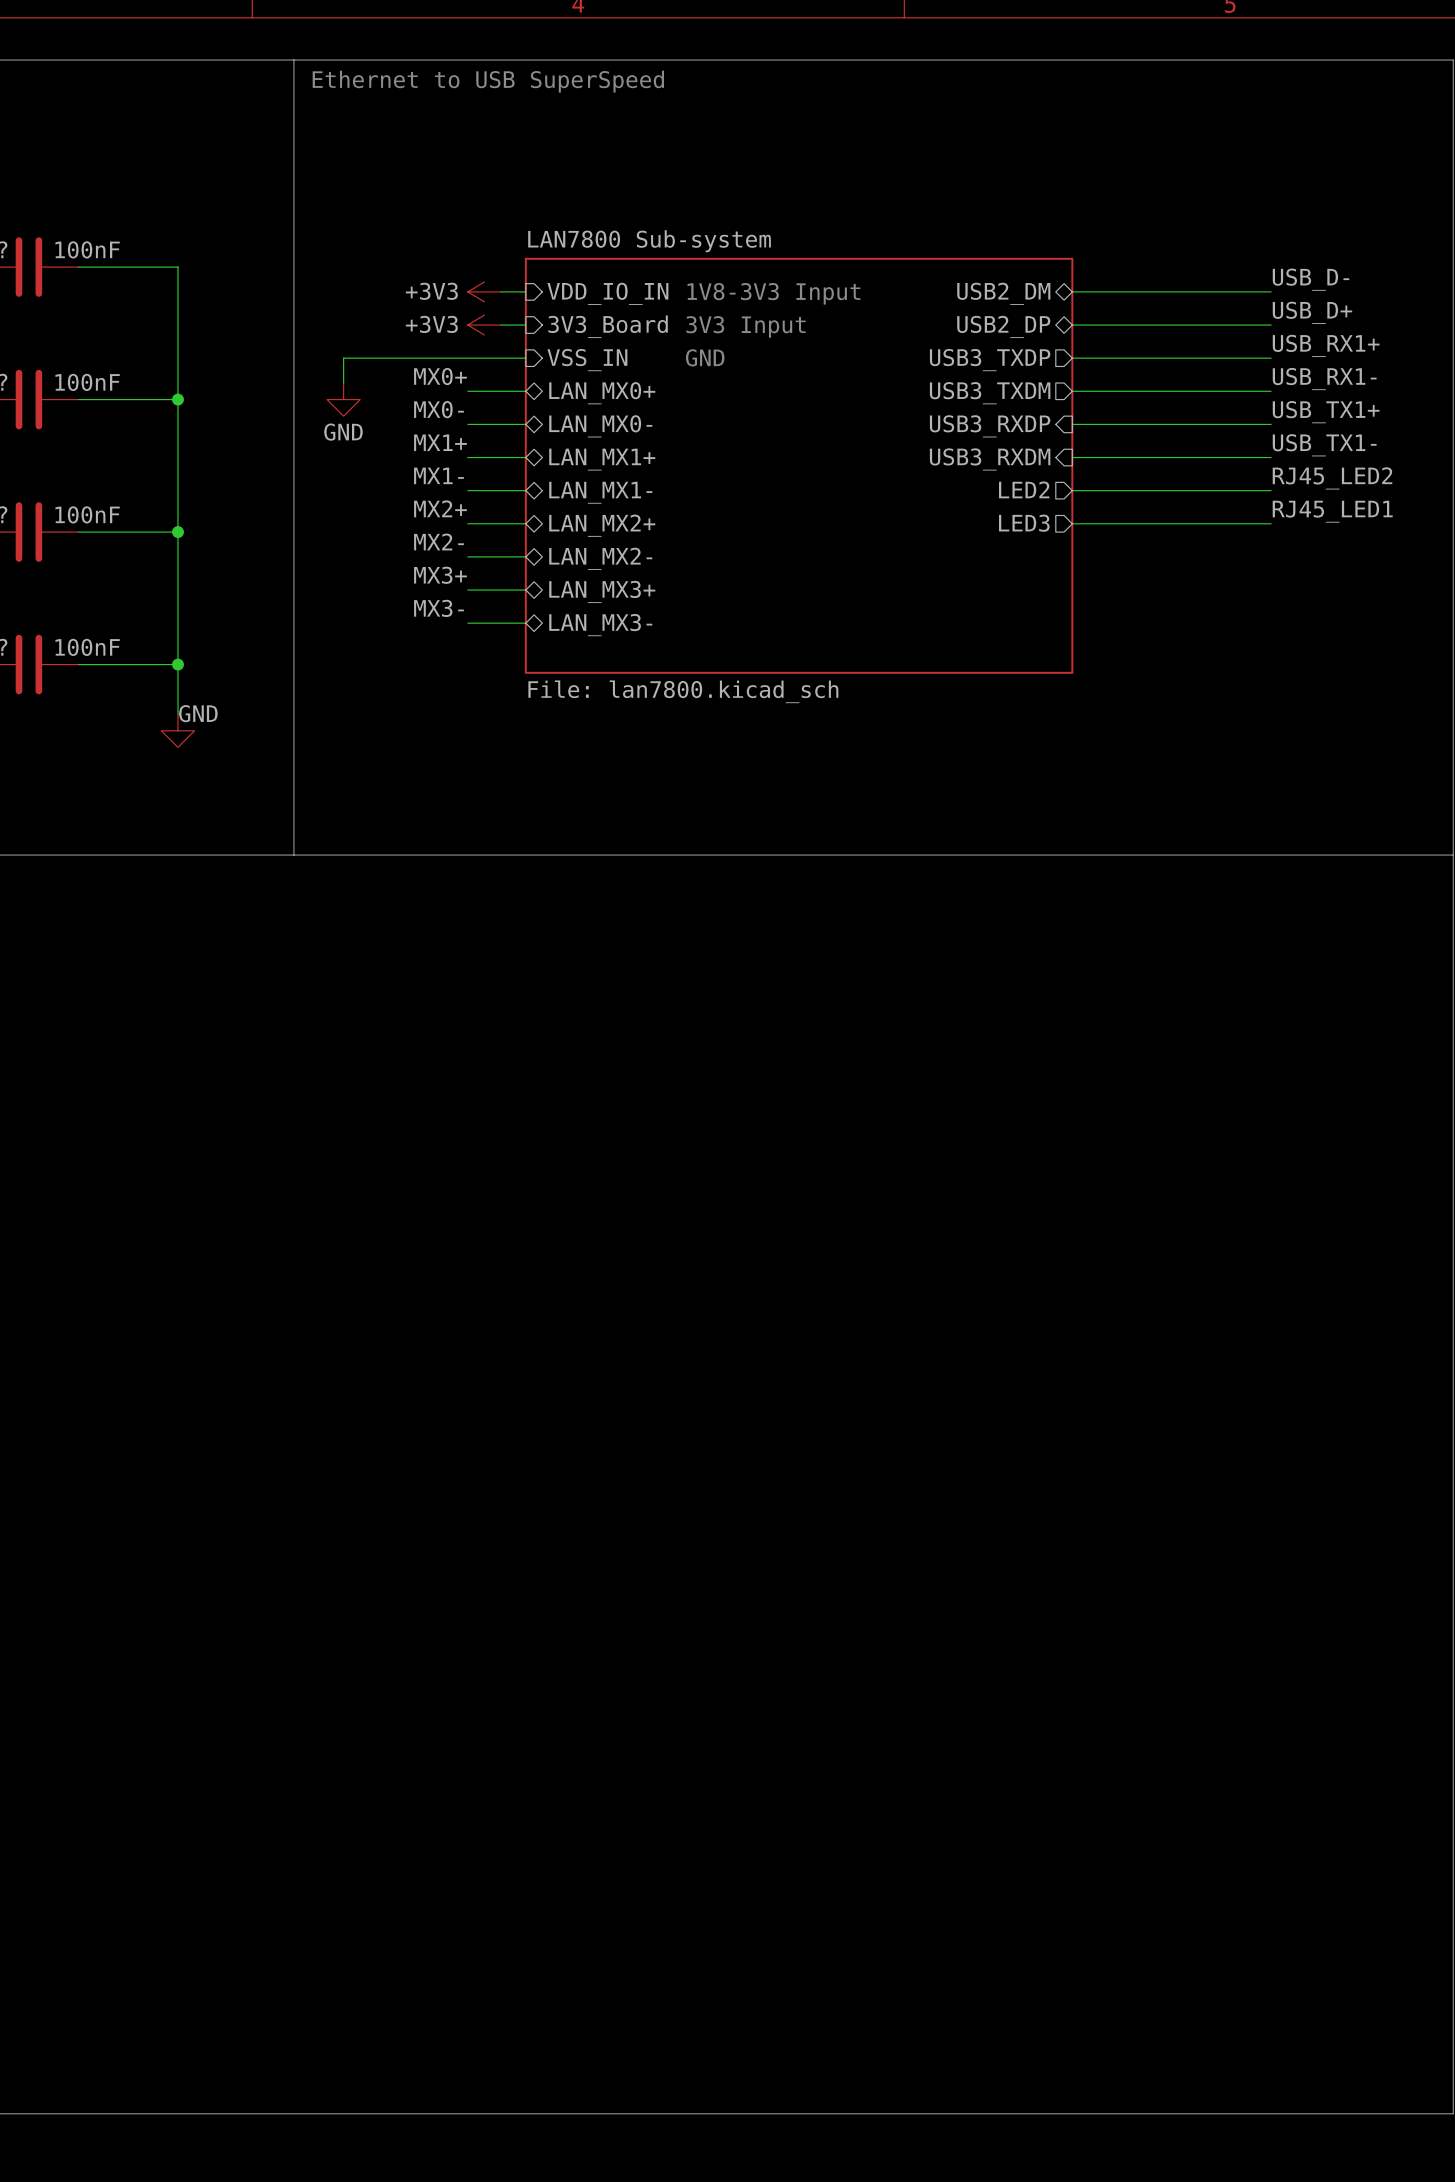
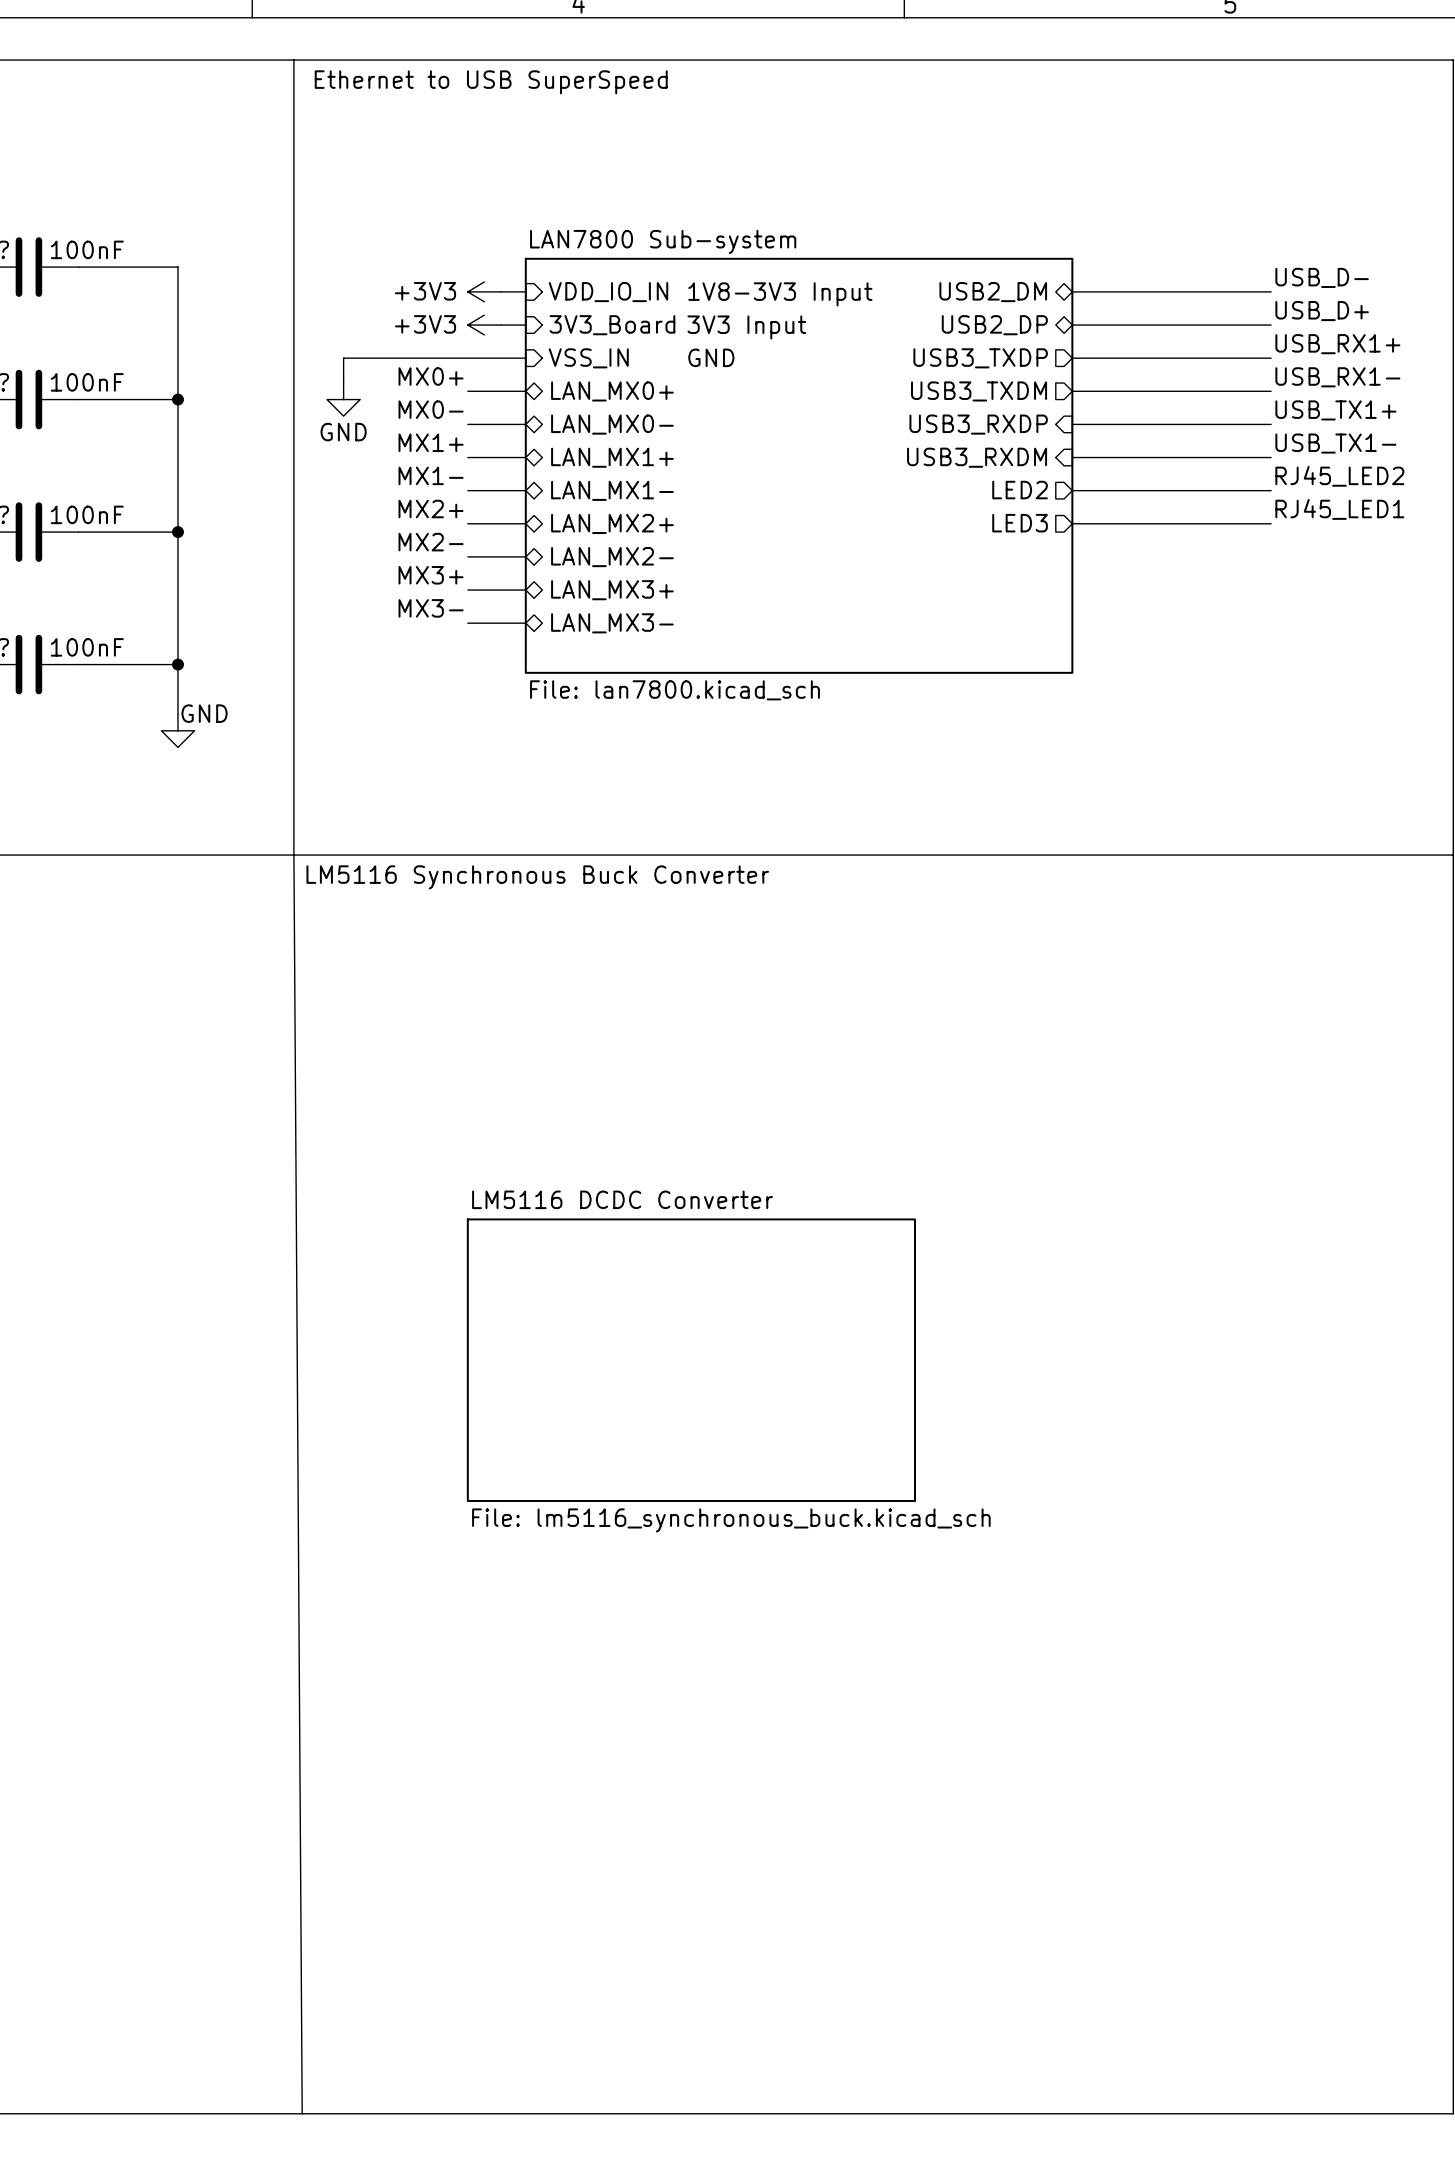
line: none -> (293, 855) (302, 2113)
text: none -> LM5116 Synchronous Buck Converter (537, 877)
sheet LM5116 DCDC Converter: none -> File: lm5116_synchronous_buck.kicad_sch (691, 1360)

